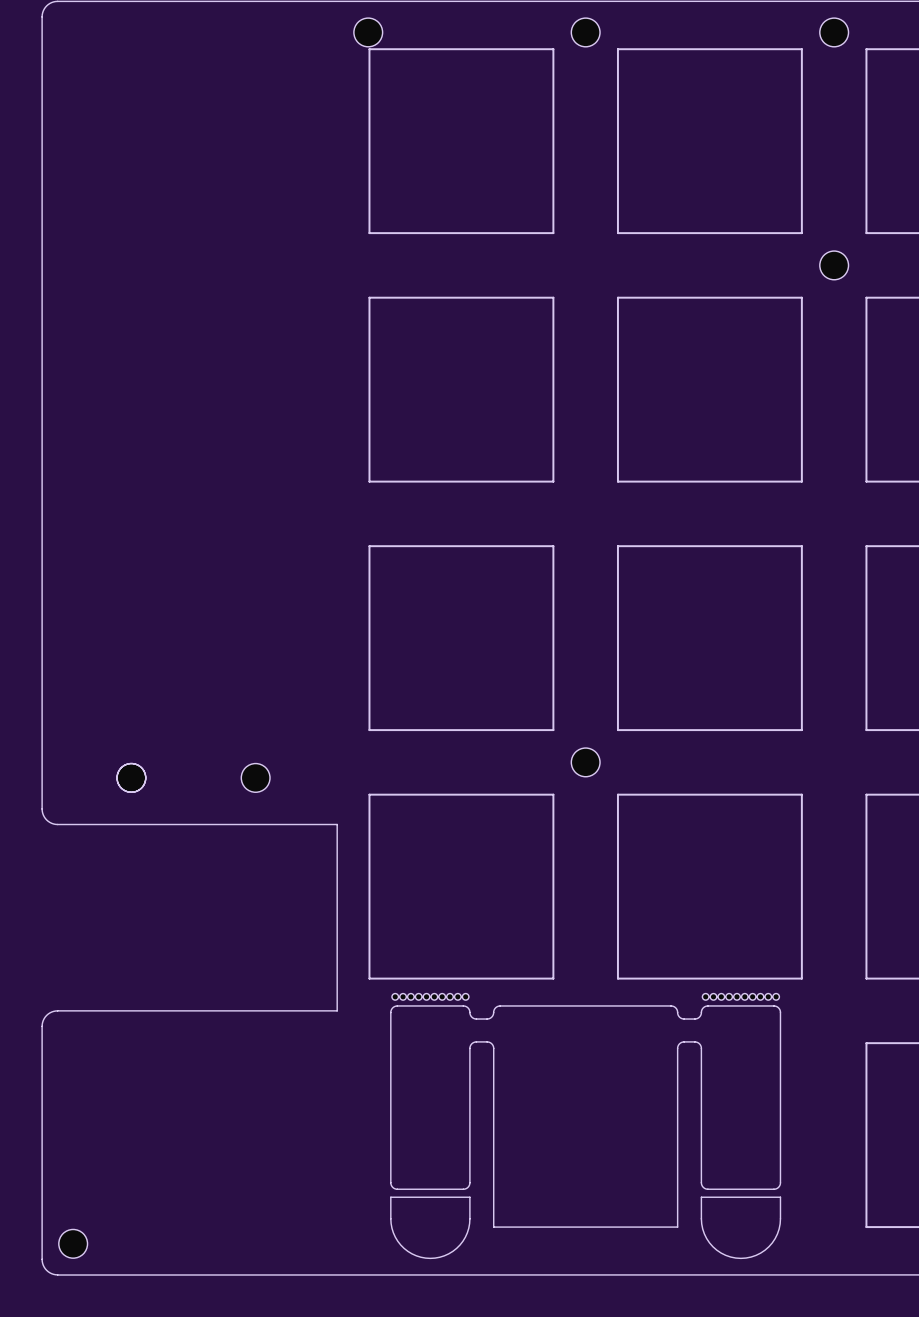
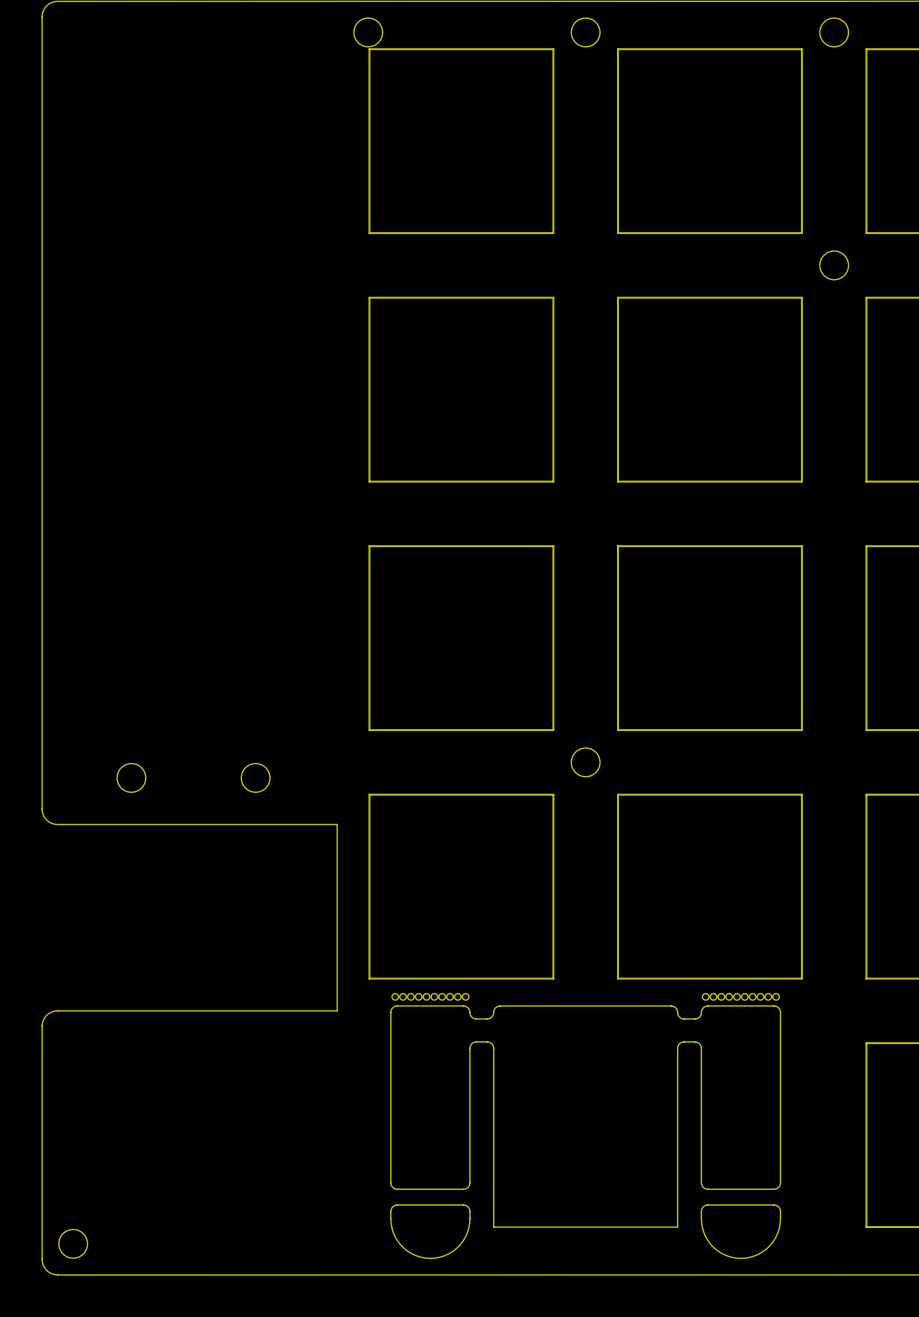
part: (131, 777) -> none
part footprint: [390, 993, 781, 1259] -> [390, 993, 781, 1259]

